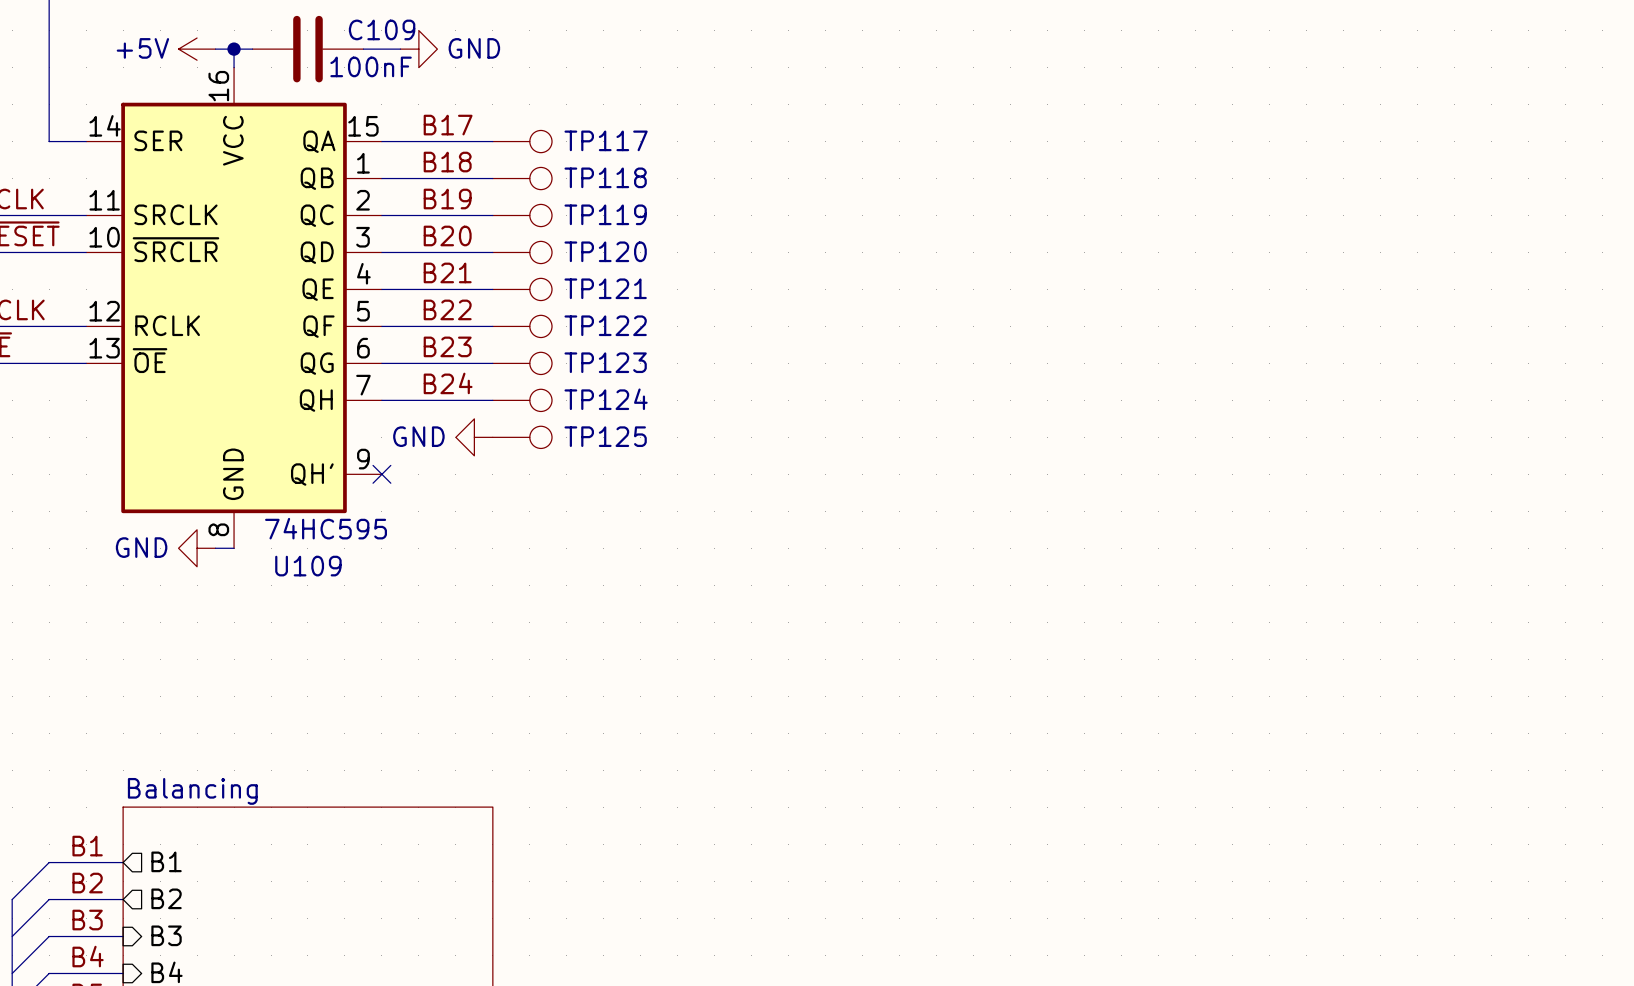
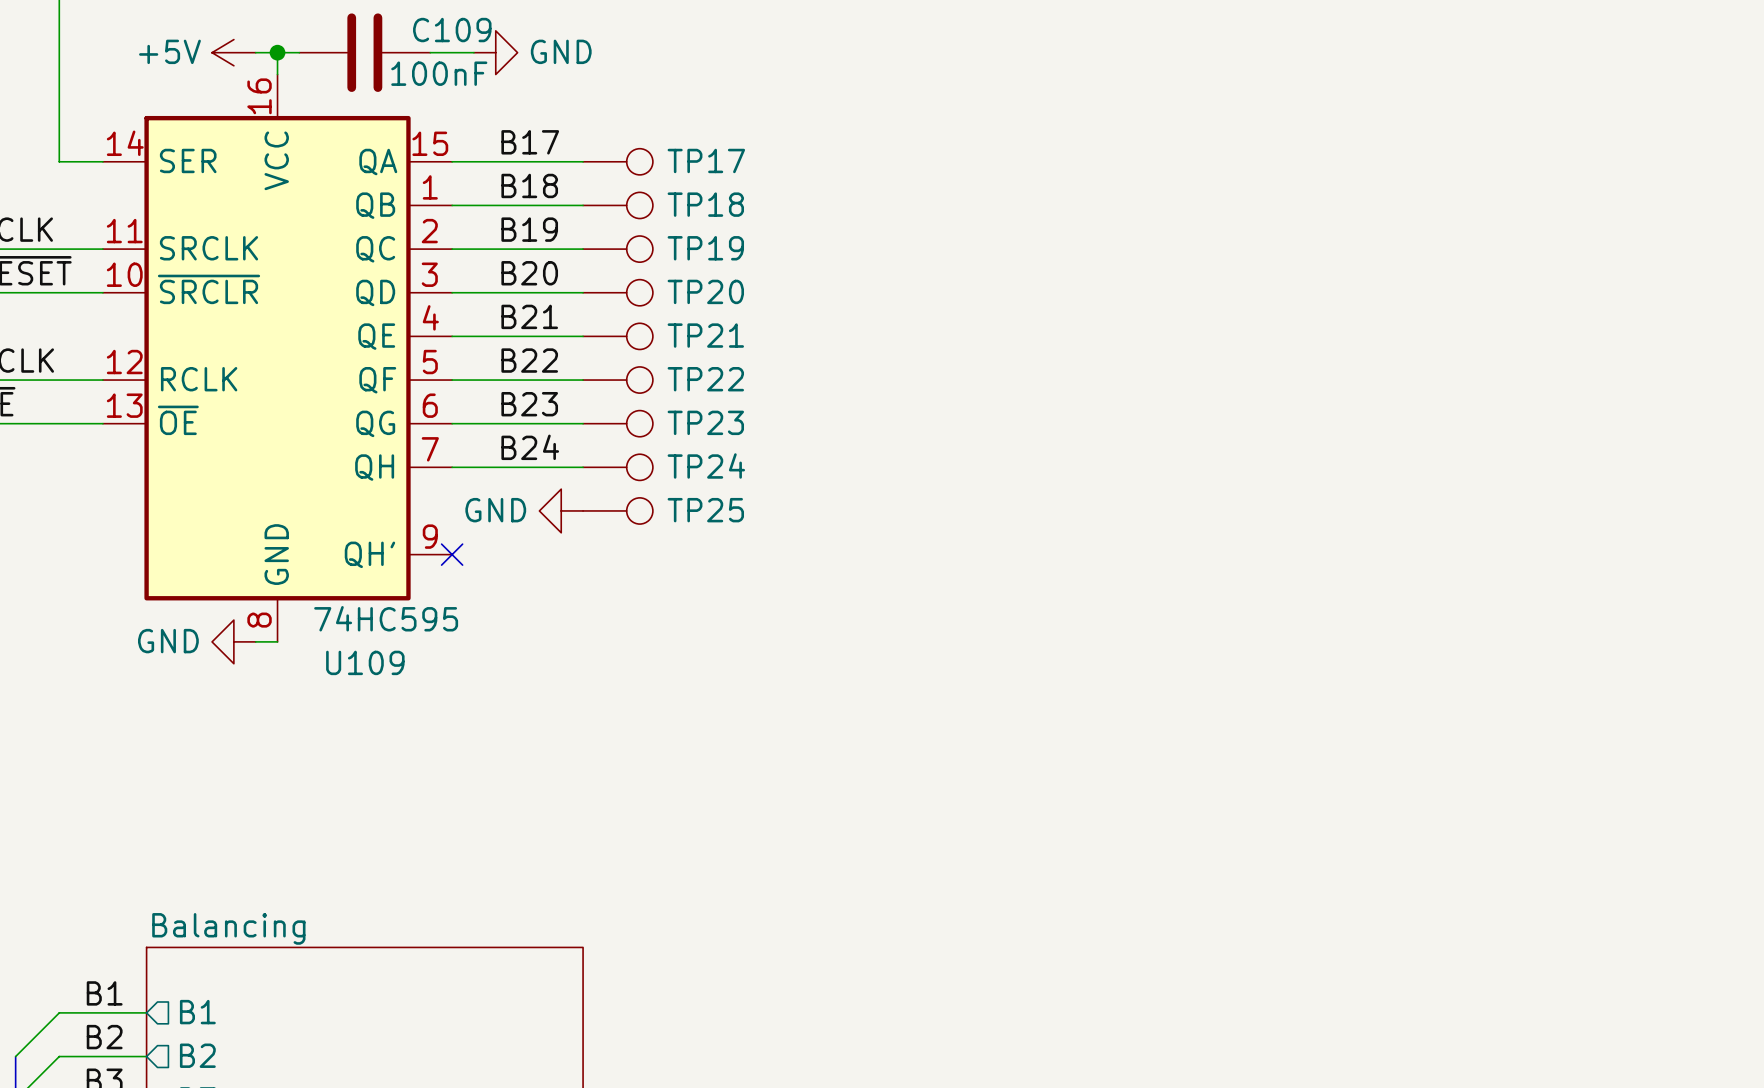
TP117 name: TP117 (606, 140) -> TP17 (706, 160)
TP118 name: TP118 (605, 177) -> TP18 (705, 204)
TP119 name: TP119 (605, 214) -> TP19 (705, 248)
TP120 name: TP120 (605, 251) -> TP20 (705, 291)
TP121 name: TP121 (605, 288) -> TP21 (705, 335)
TP122 name: TP122 (605, 325) -> TP22 (705, 379)
TP123 name: TP123 (605, 362) -> TP23 (705, 422)
TP124 name: TP124 (606, 399) -> TP24 (706, 465)
TP125 name: TP125 (605, 436) -> TP25 (705, 510)

